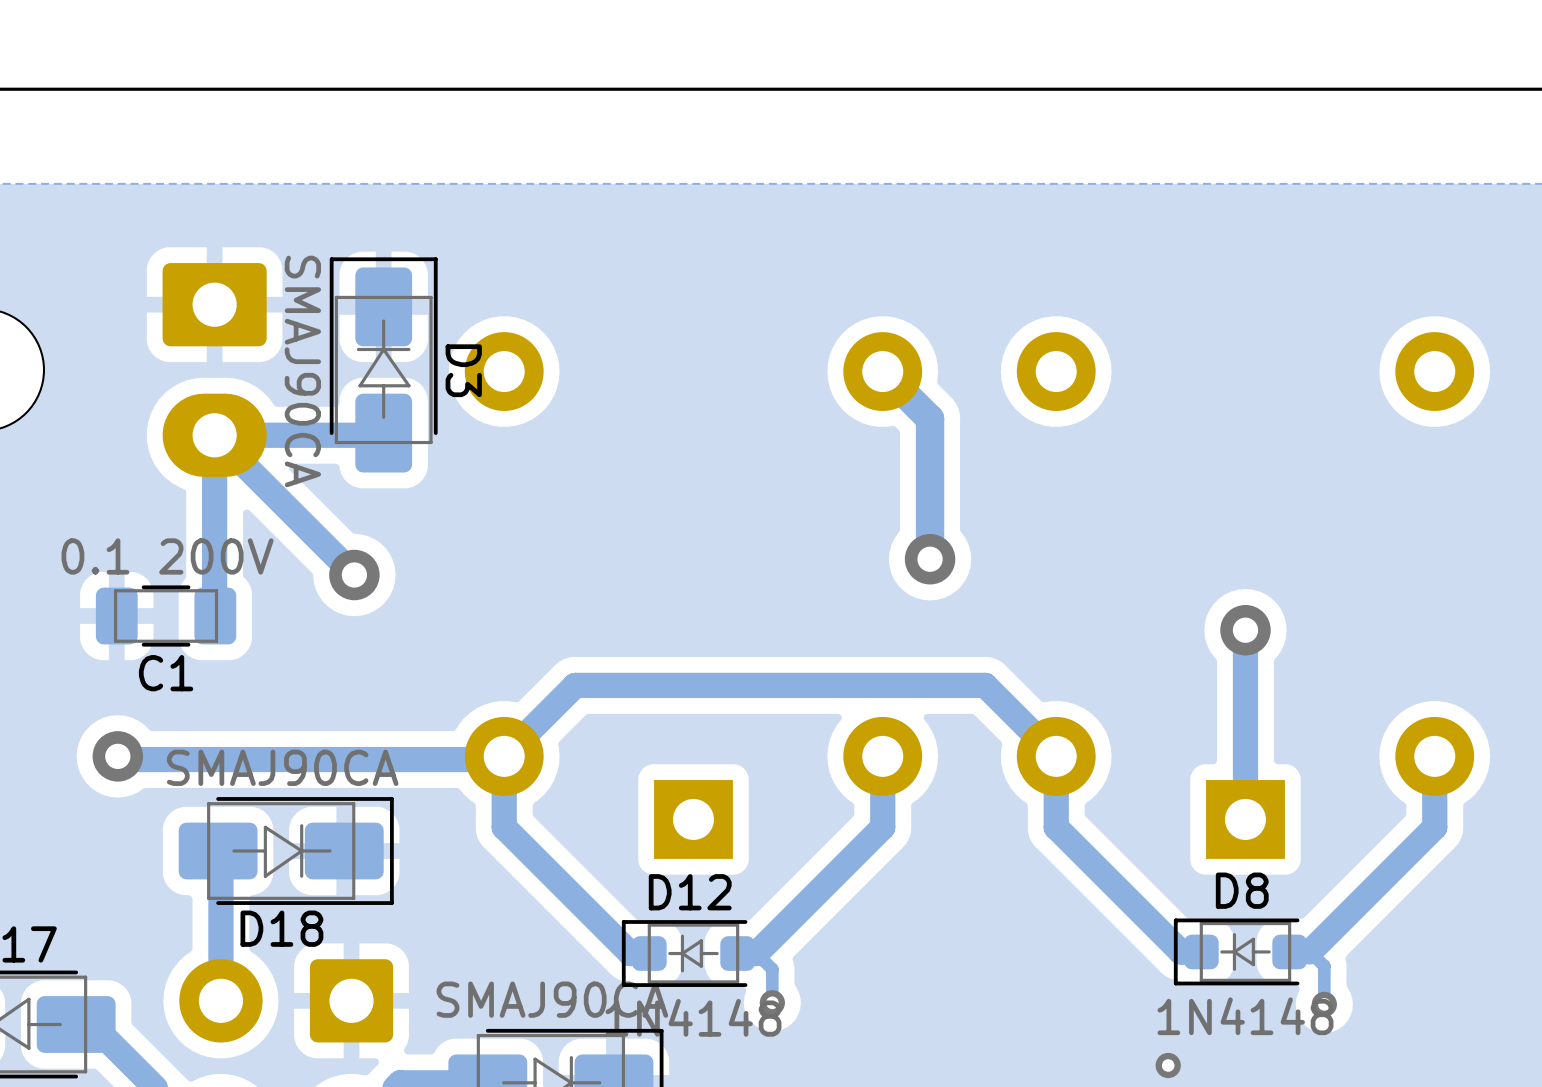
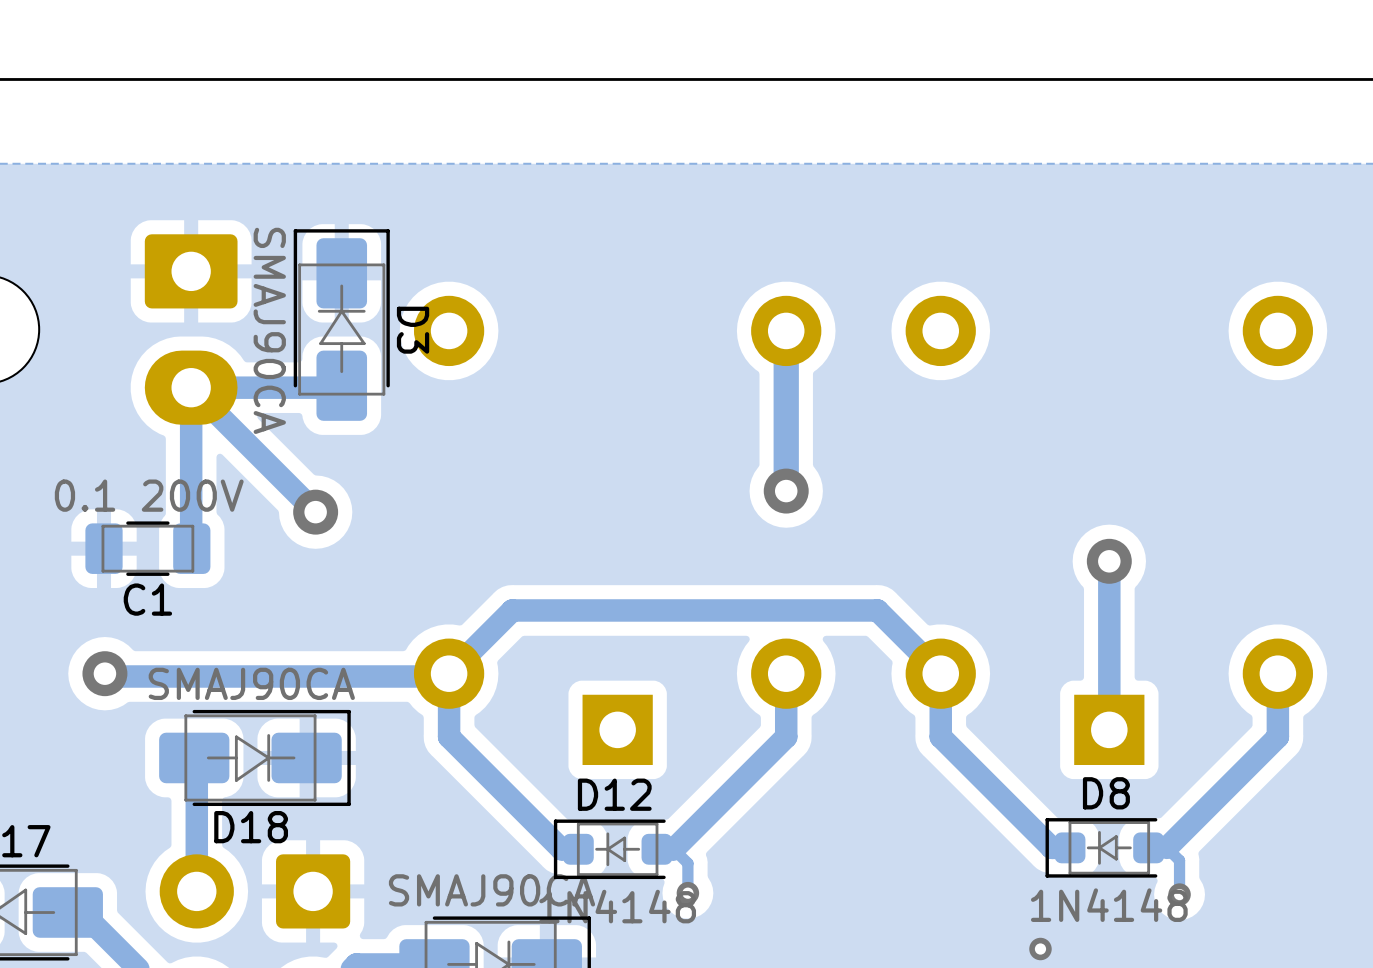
track: (882, 371) (930, 418) (930, 559) -> (786, 330) (786, 491)
via position: (930, 559) -> (786, 491)

